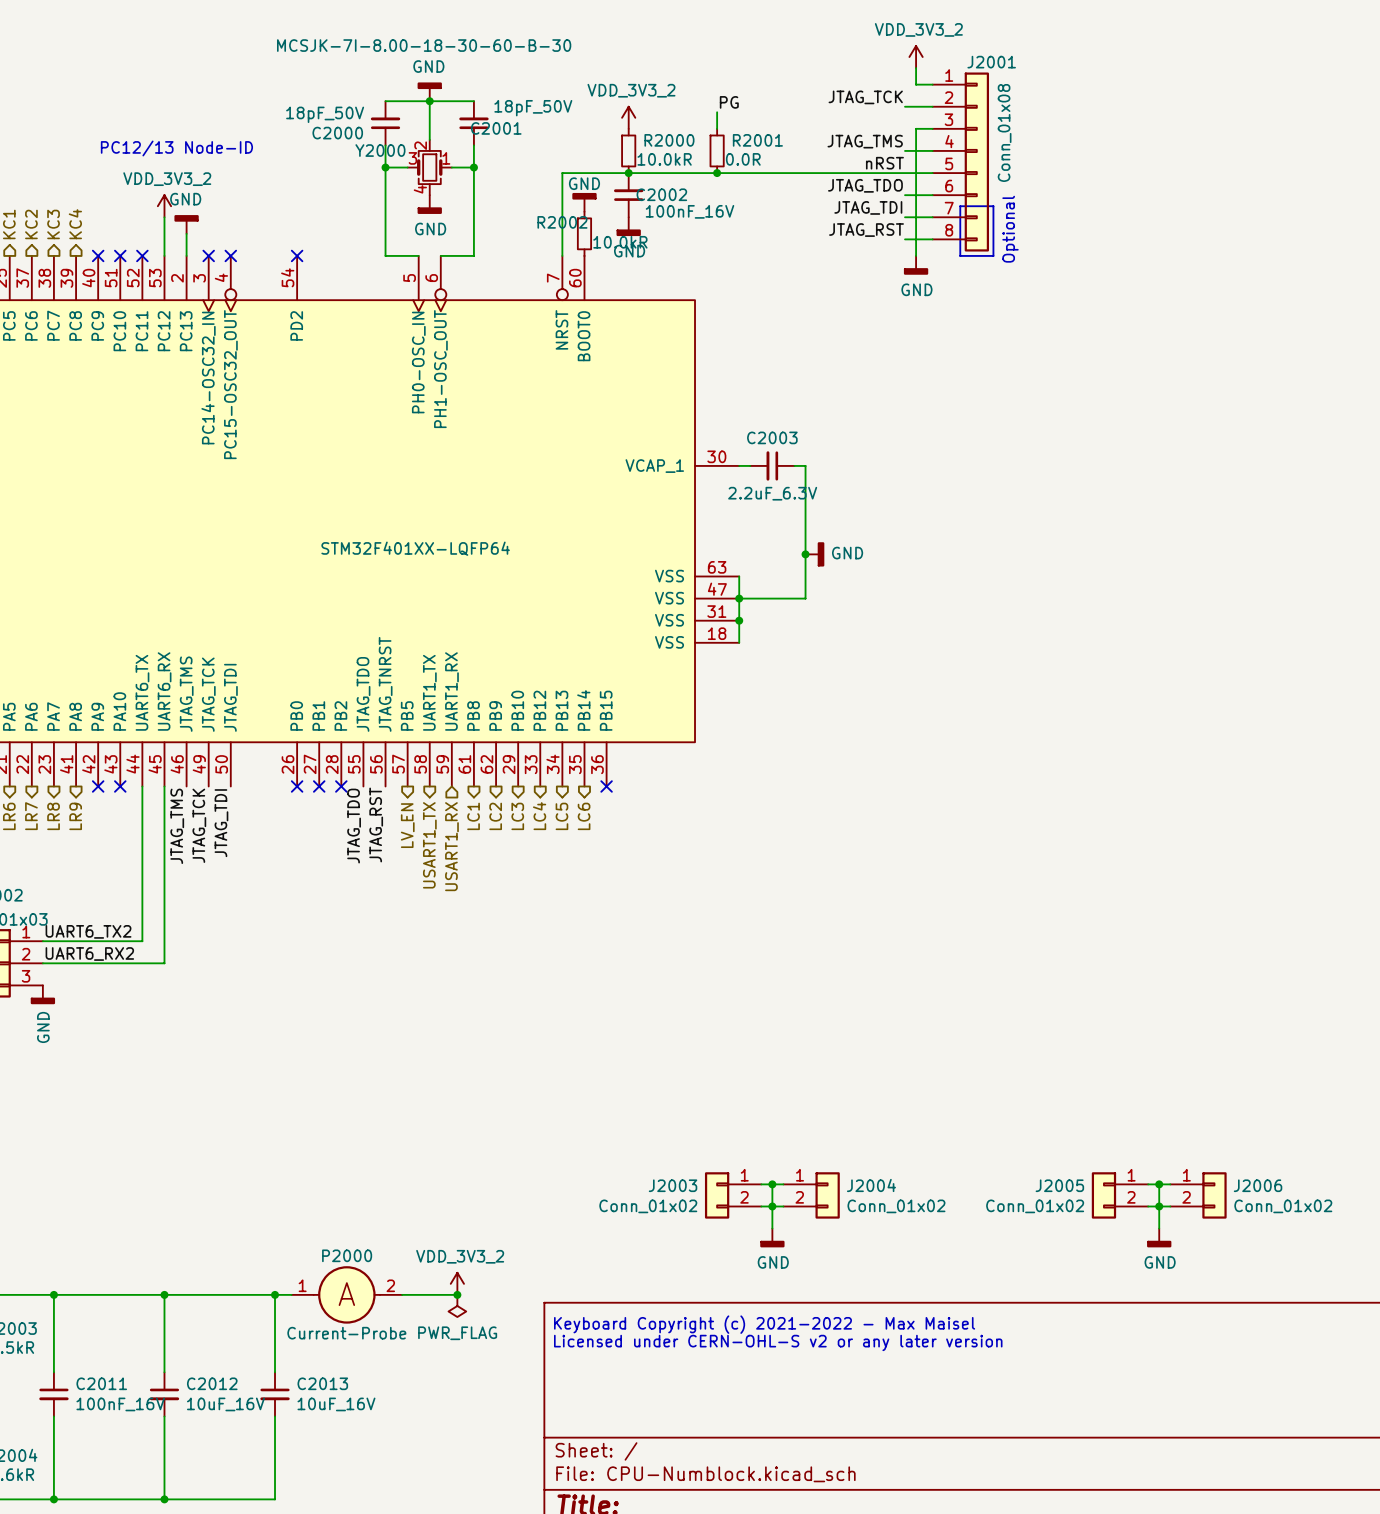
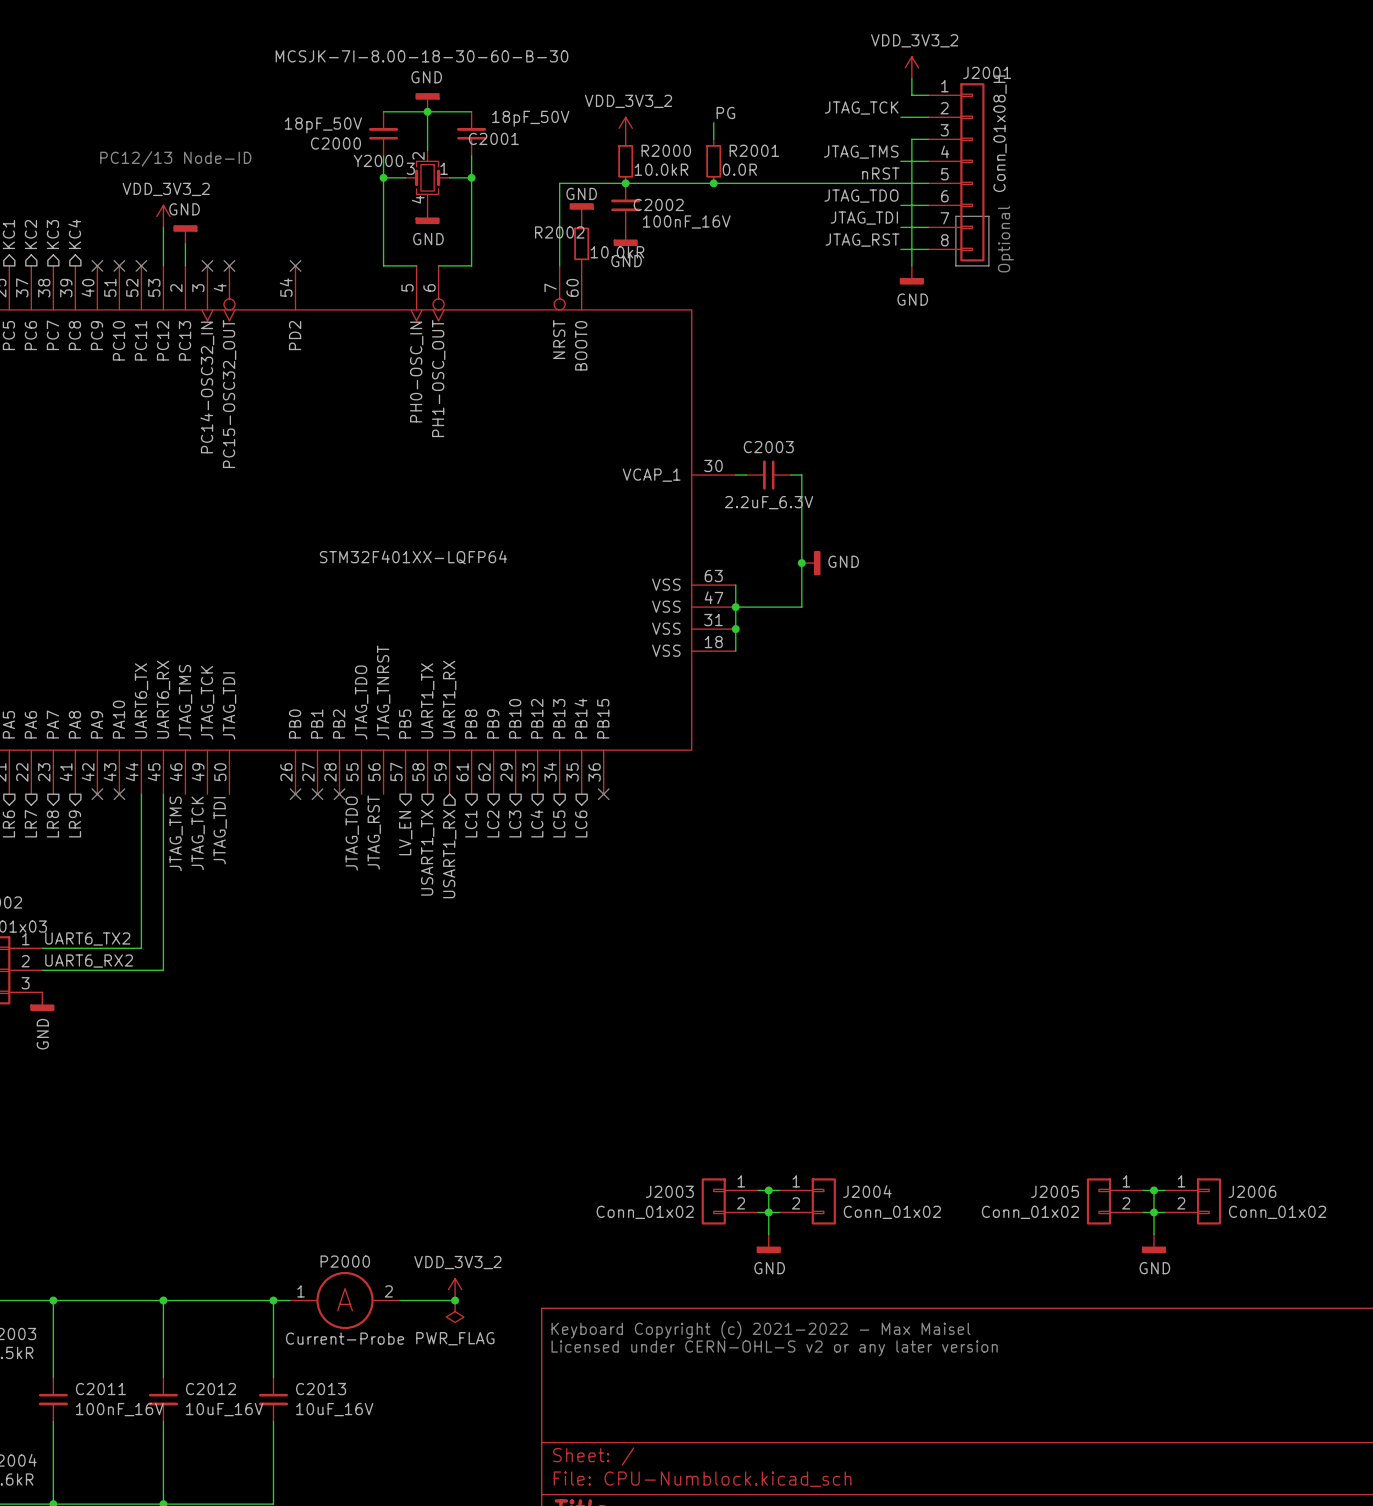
J2001 value: Conn_01x08 (1004, 132) -> Conn_01x08_H (1000, 133)

